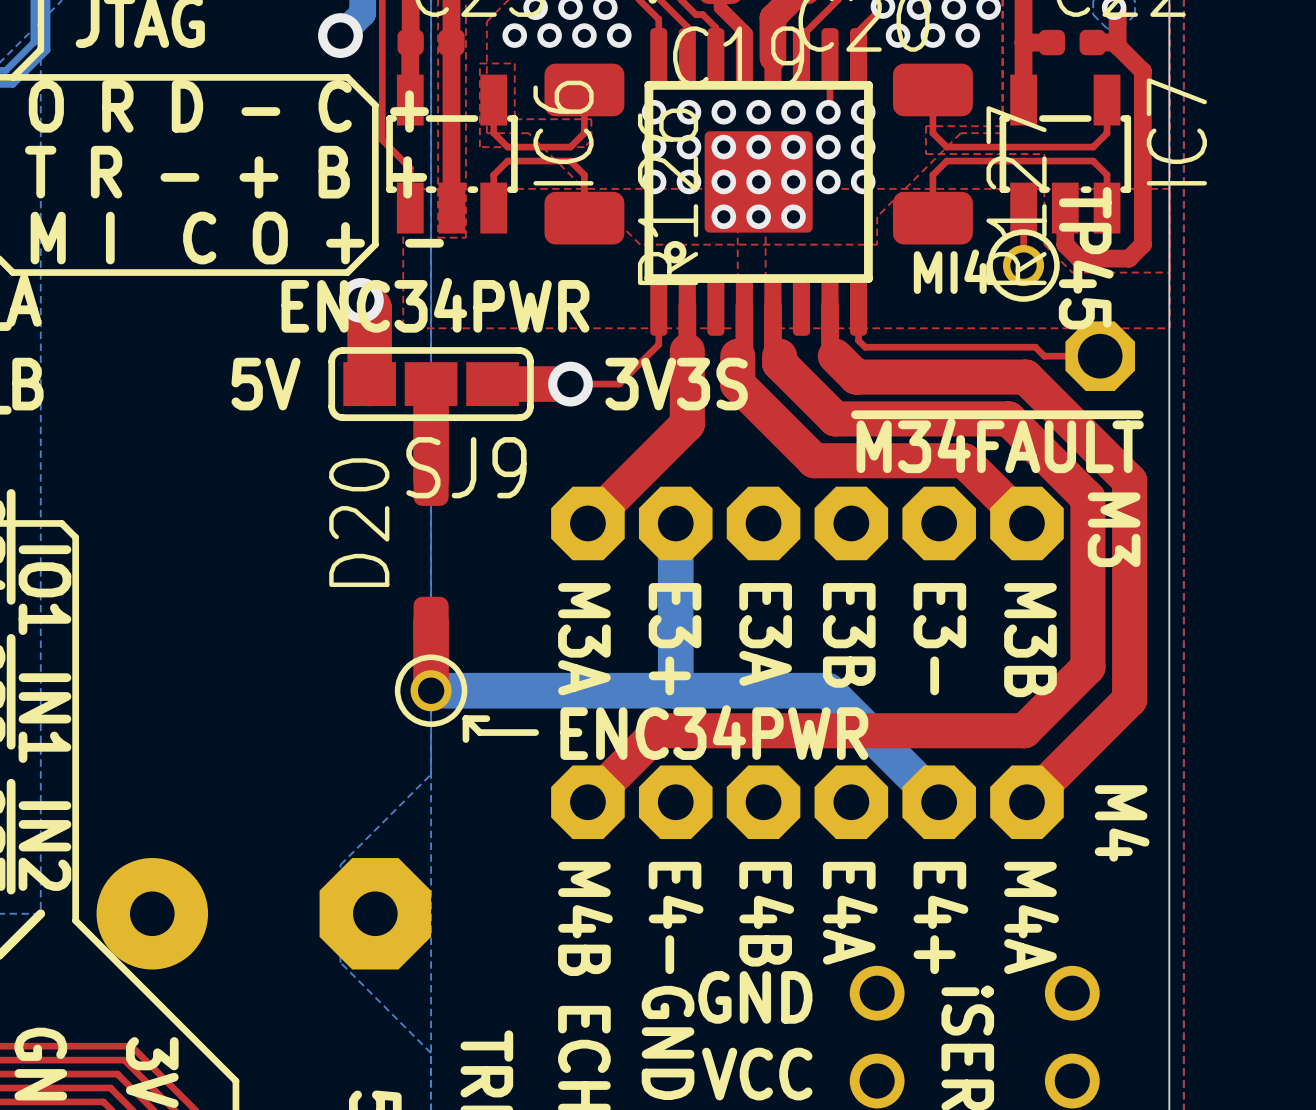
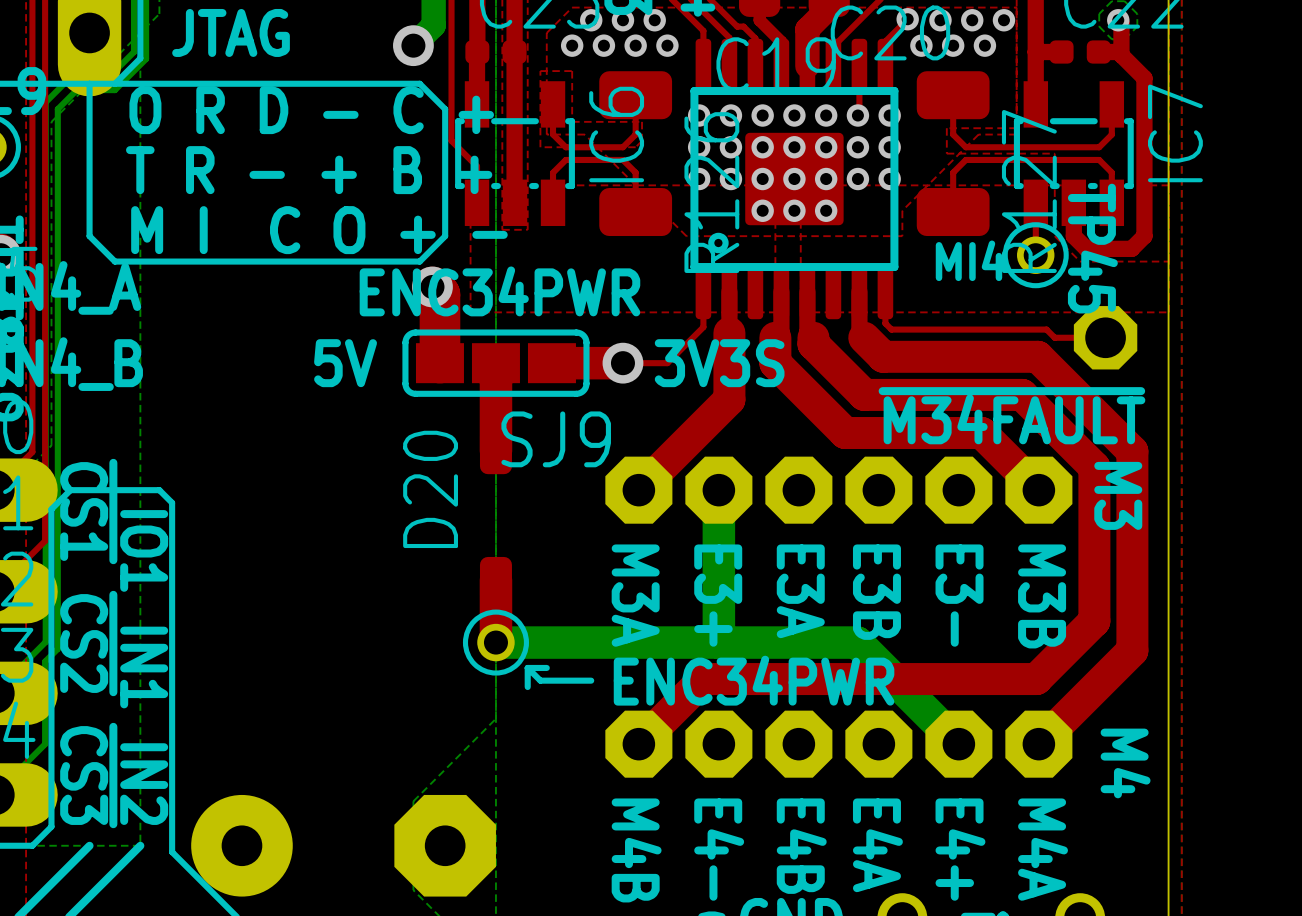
SJ9 name position: SJ9 (466, 467) -> SJ9 (556, 439)

